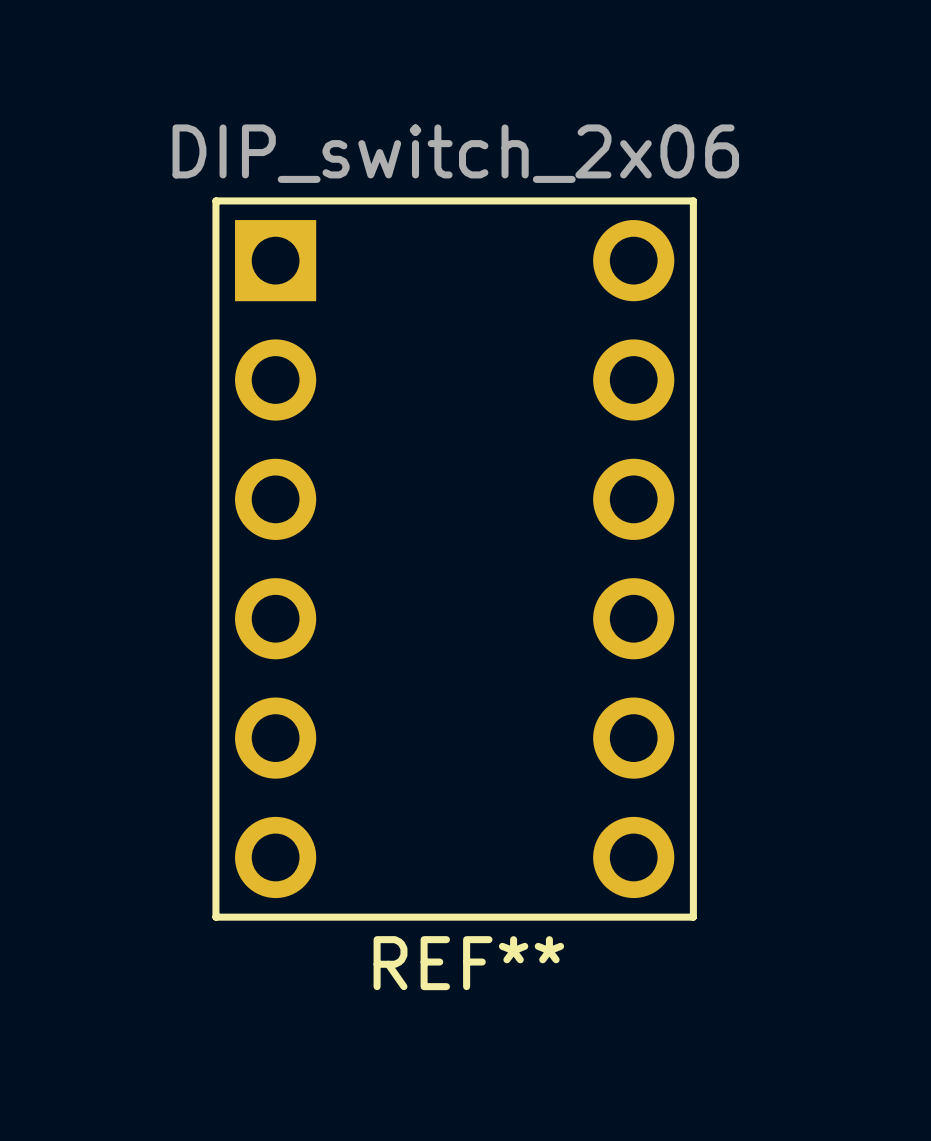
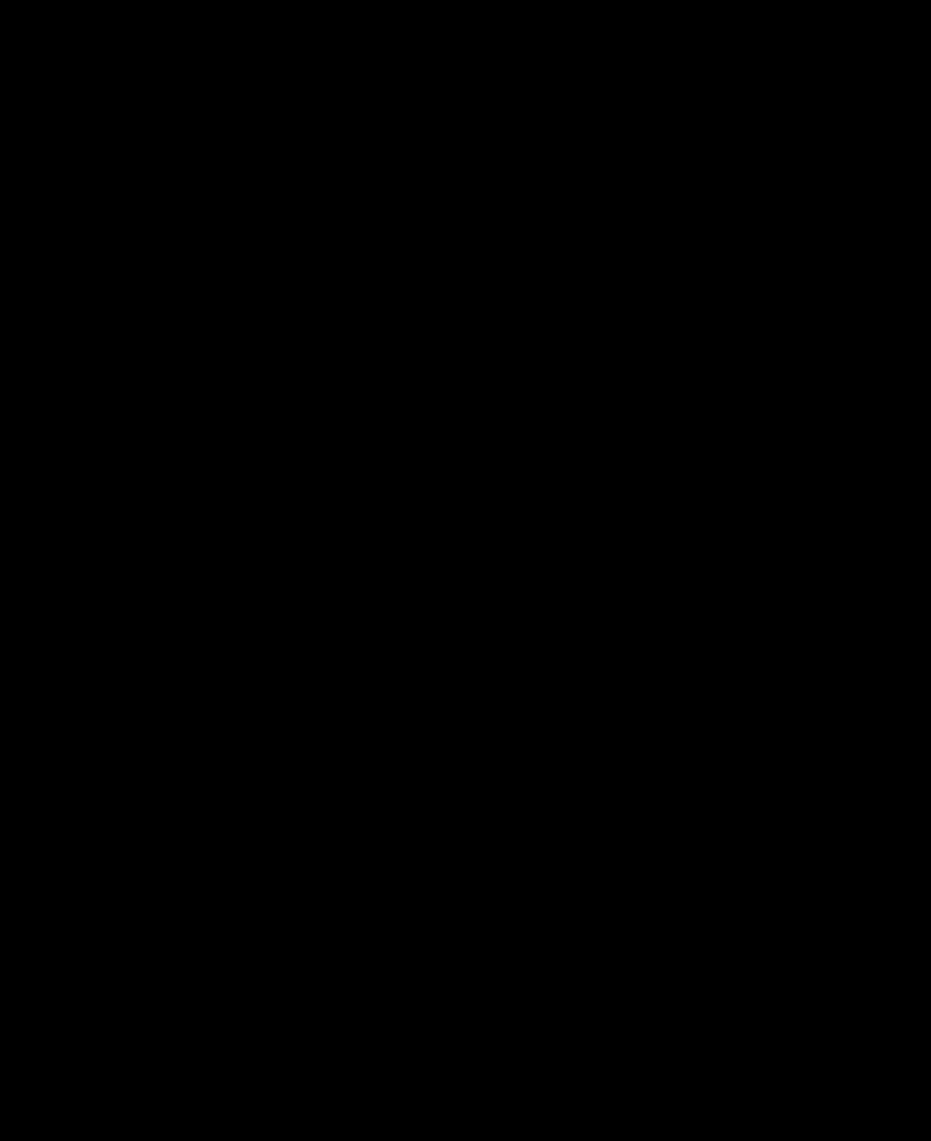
REF**: DIP_switch_2x06 (454, 559) -> none

